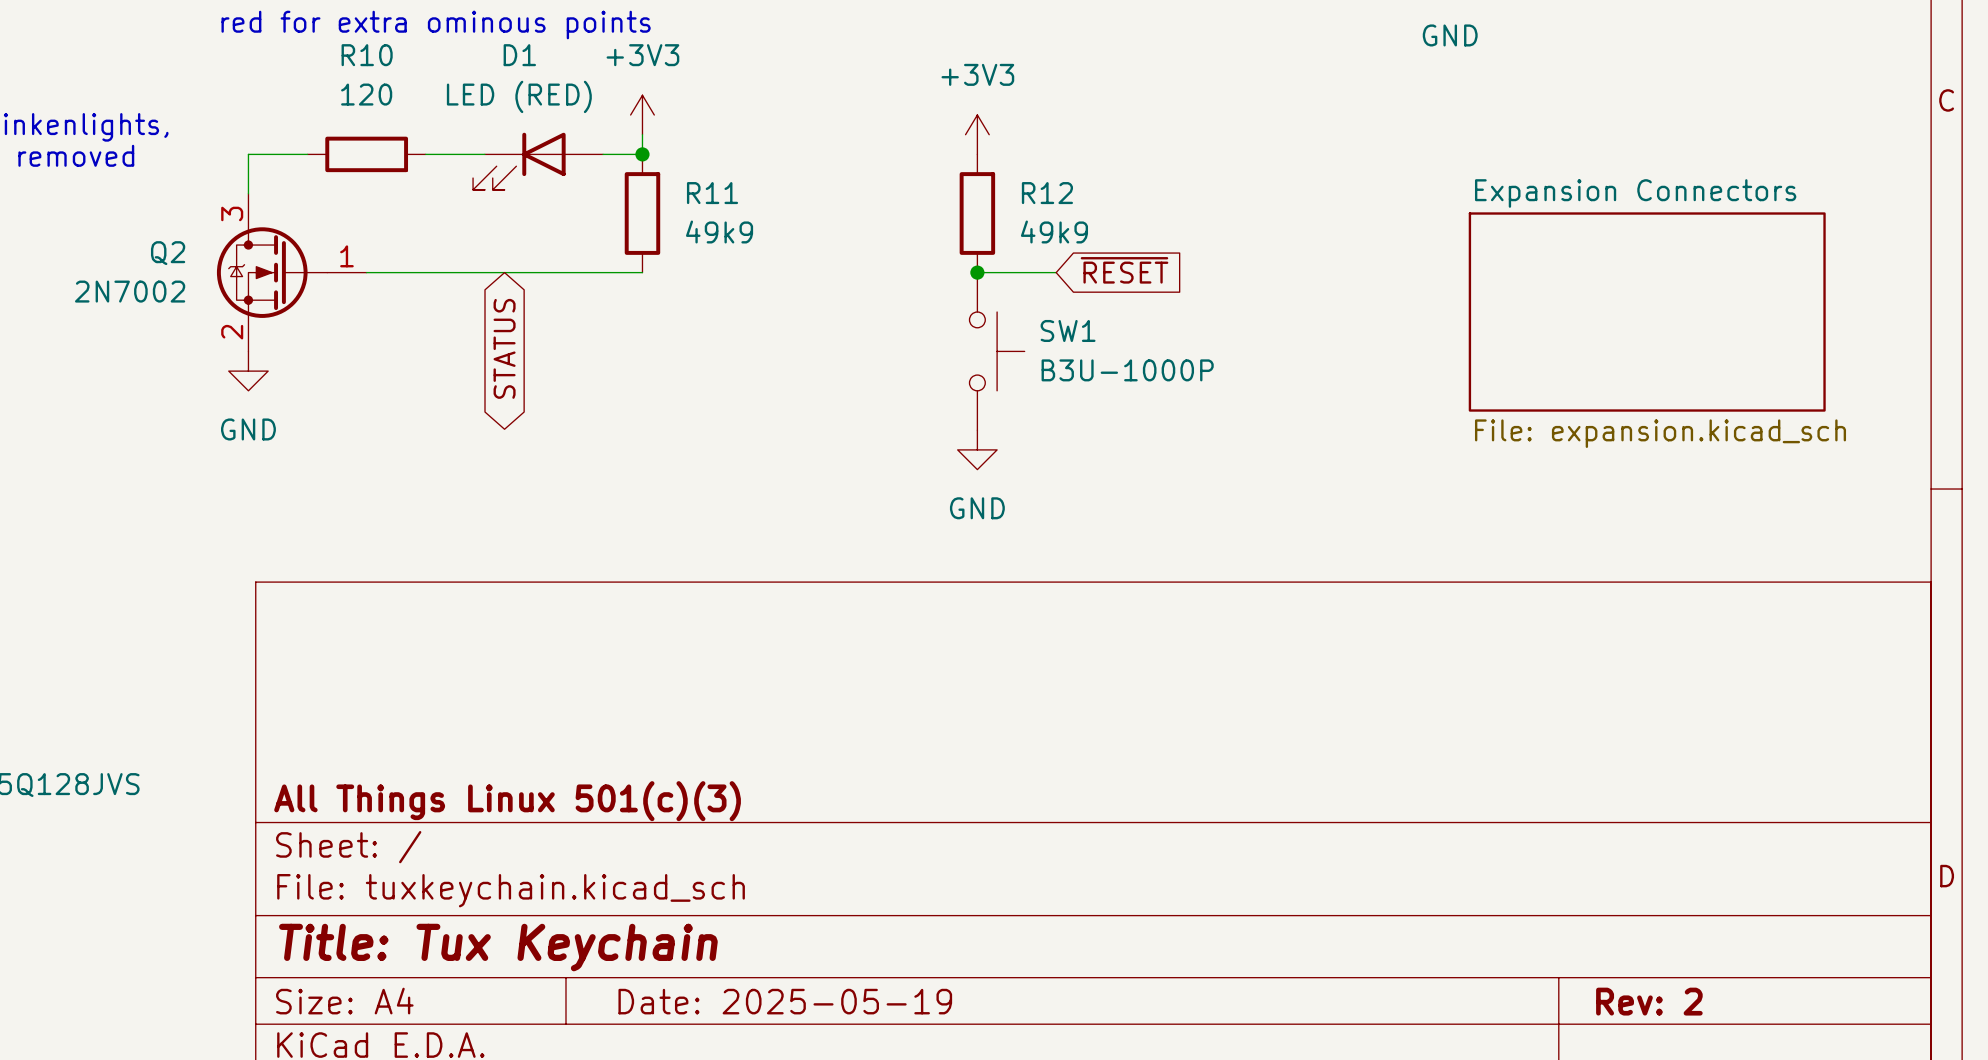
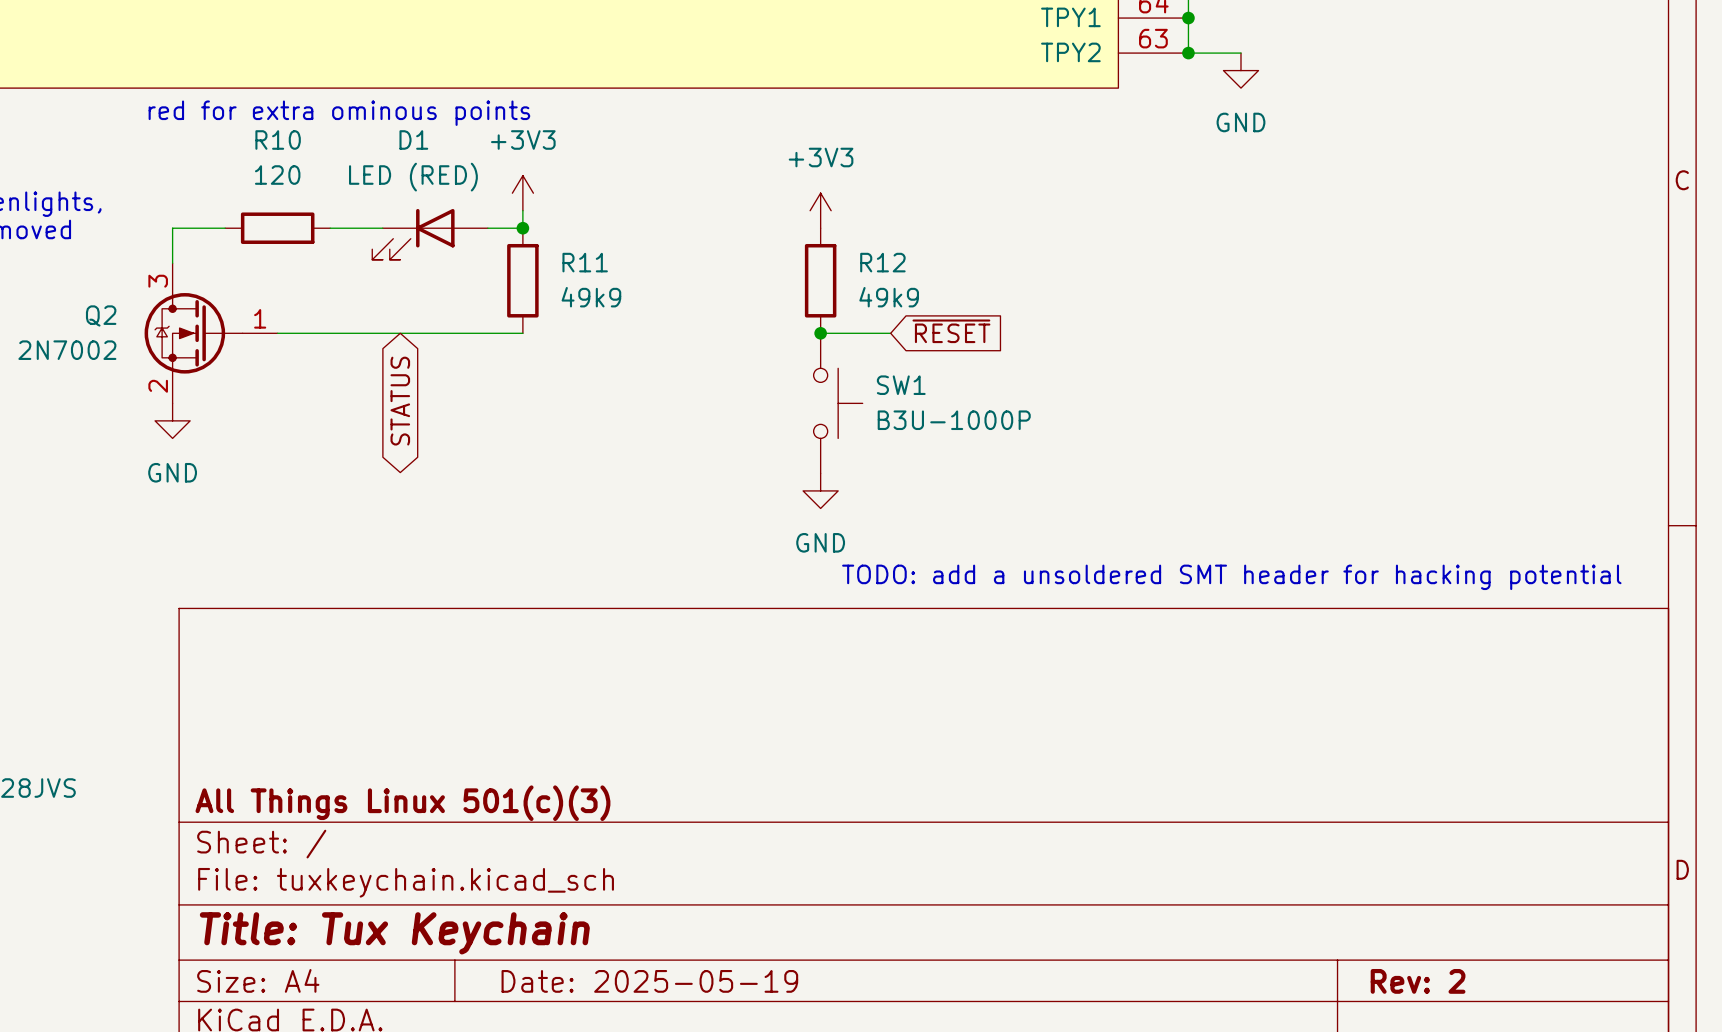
sheet Expansion Connectors: File: expansion.kicad_sch (1647, 312) -> none
text: none -> TODO: add a unsoldered SMT header for hacking potential (1231, 577)

